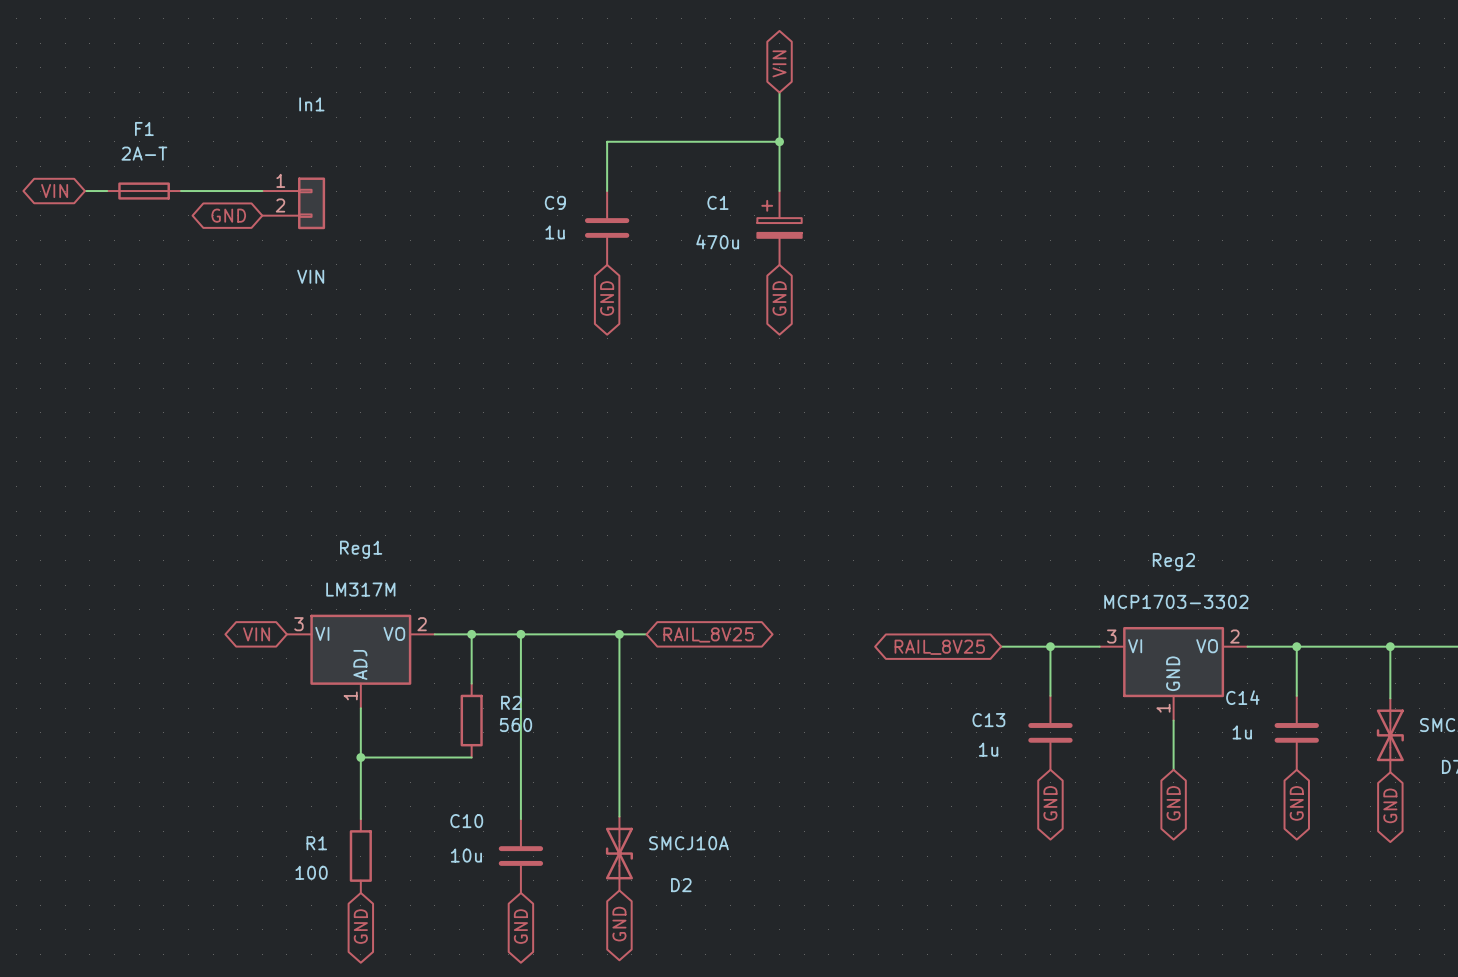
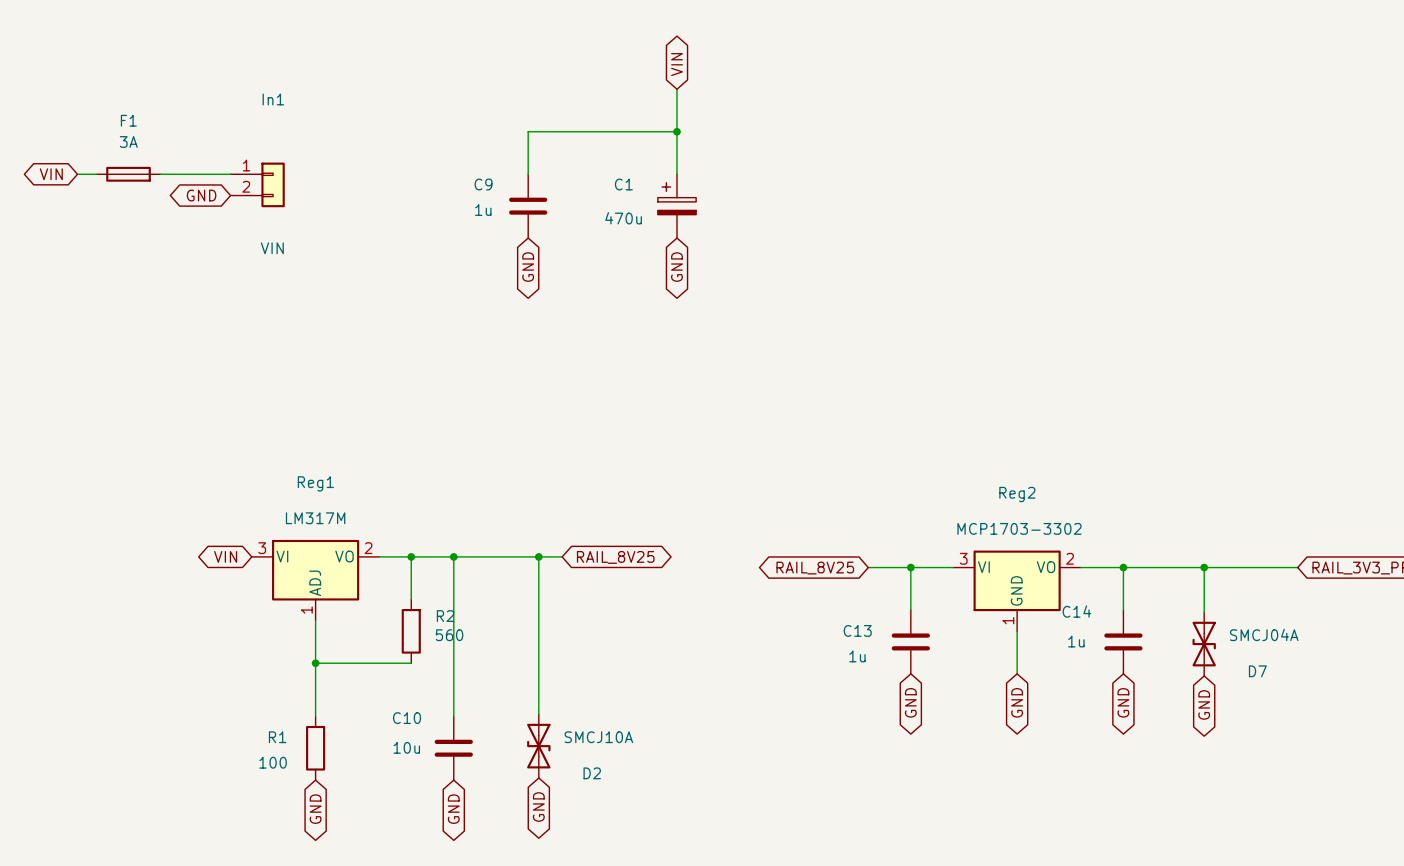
F1 value: 2A-T (144, 153) -> 3A (128, 141)

